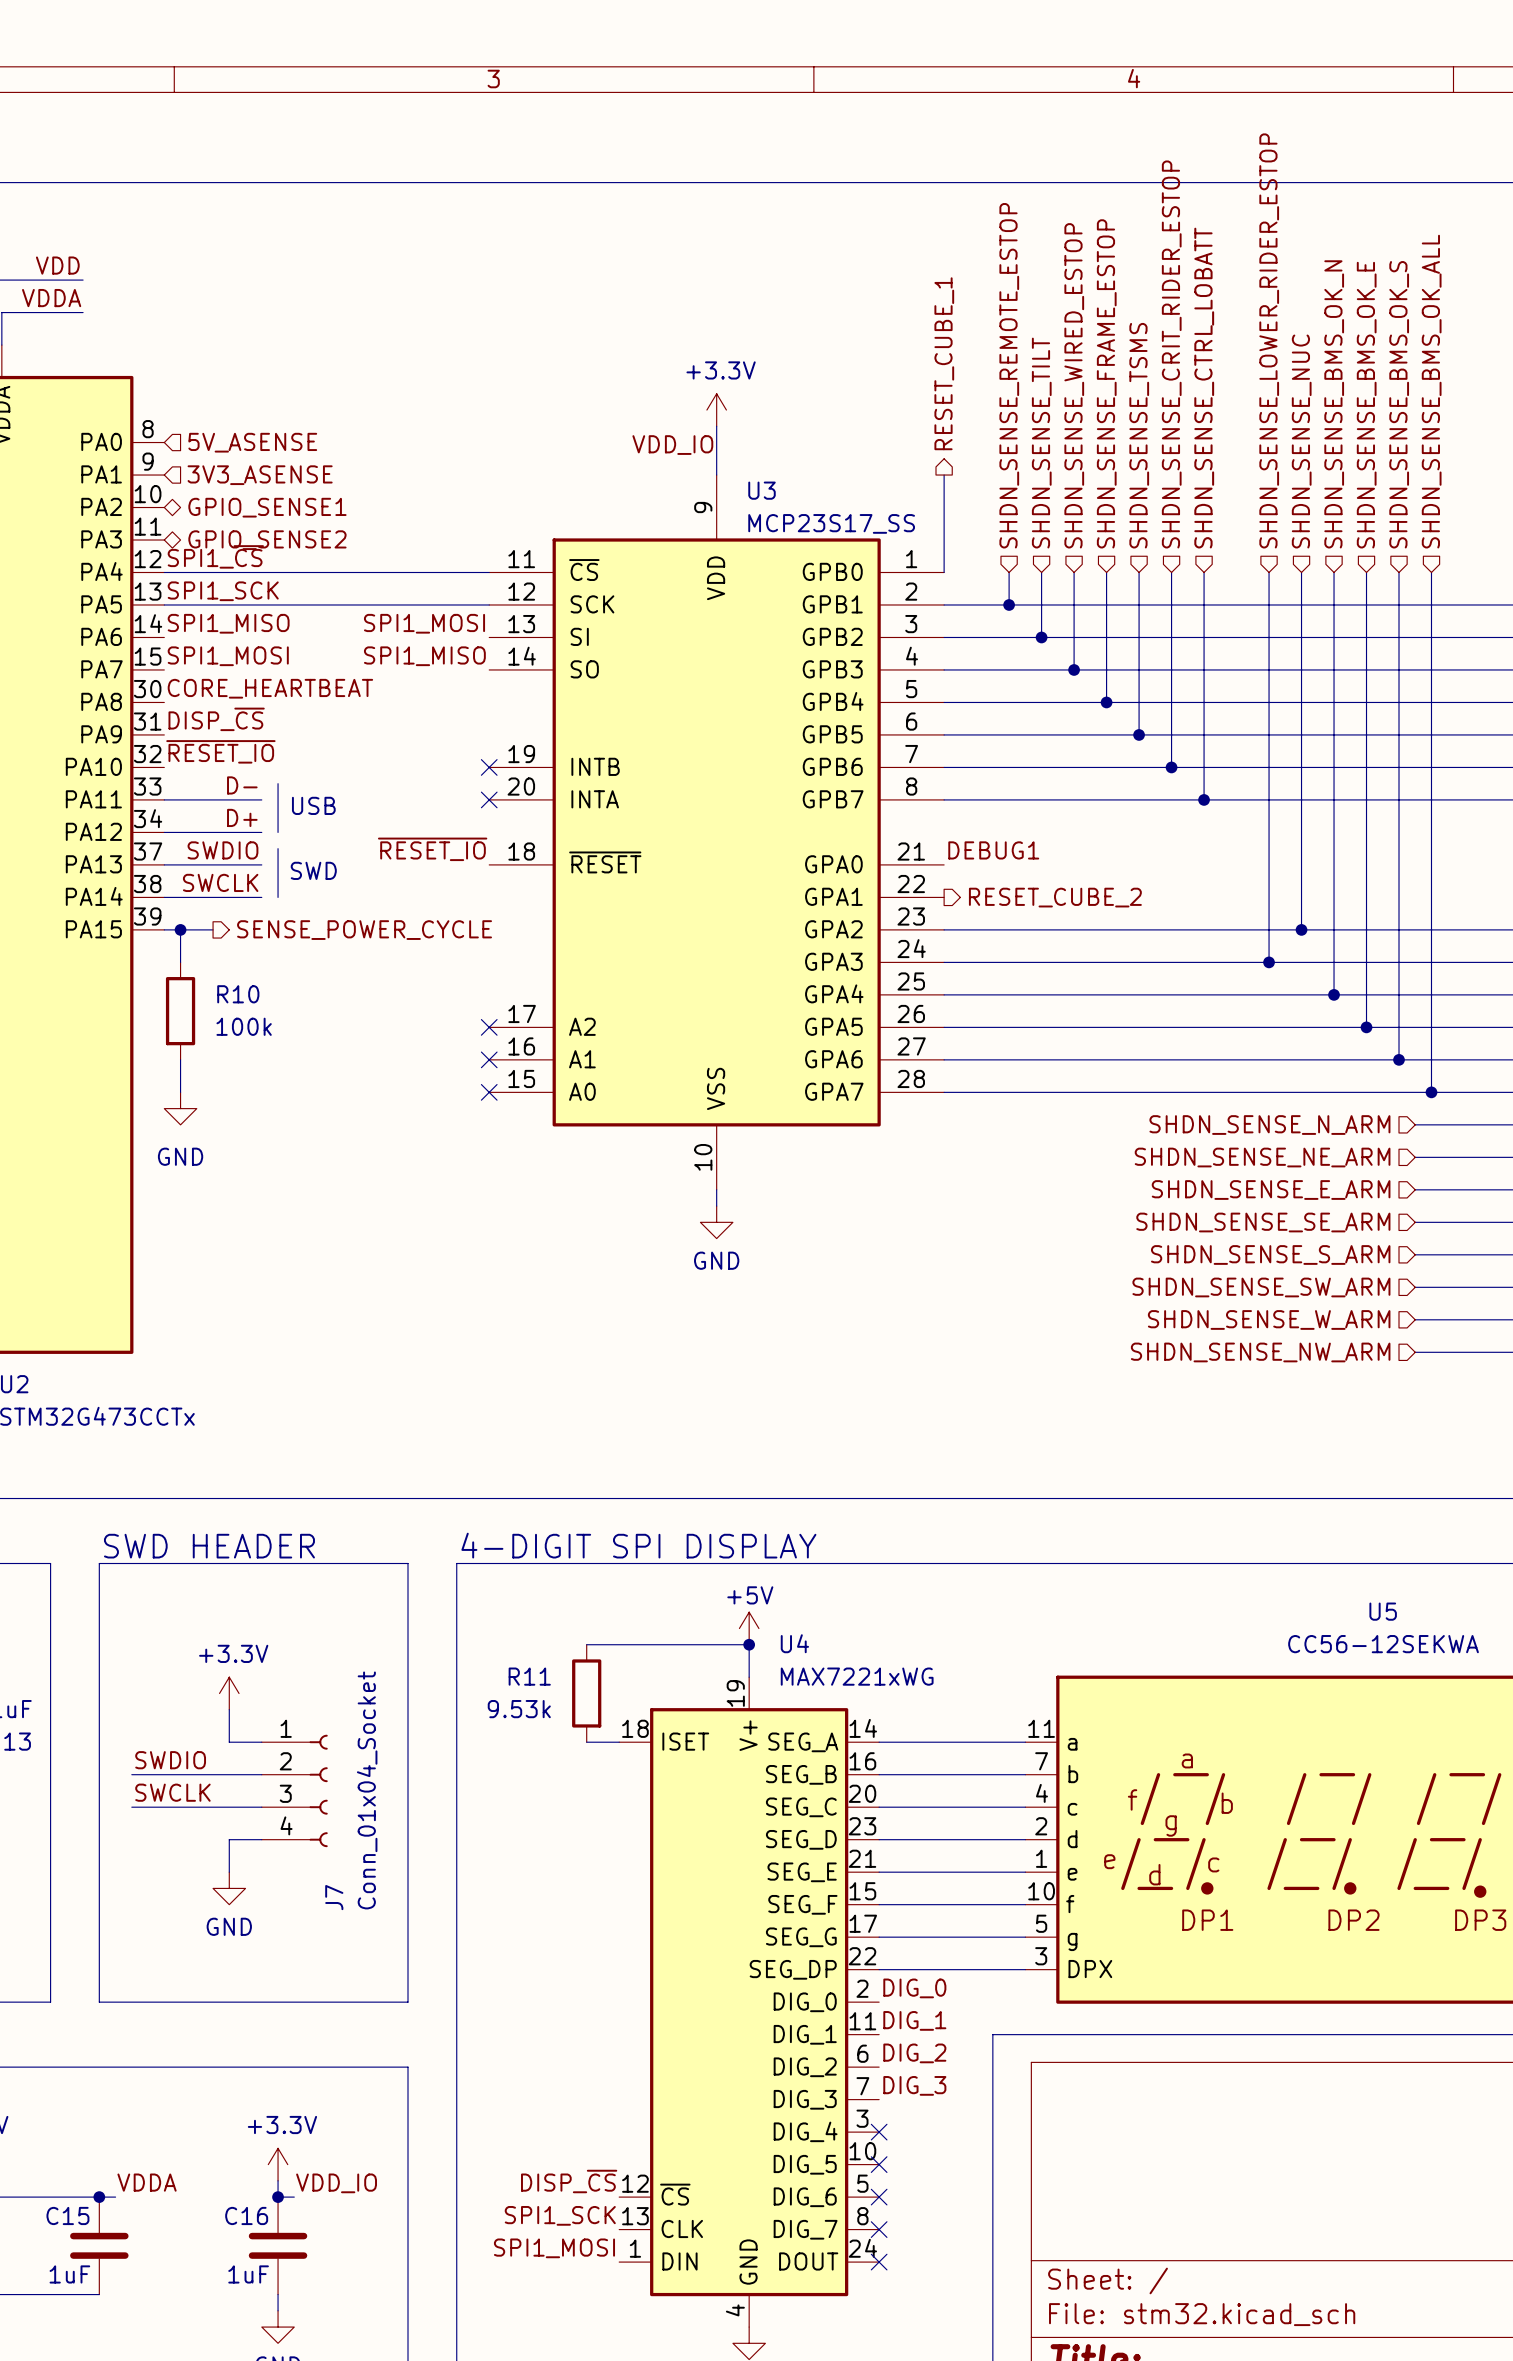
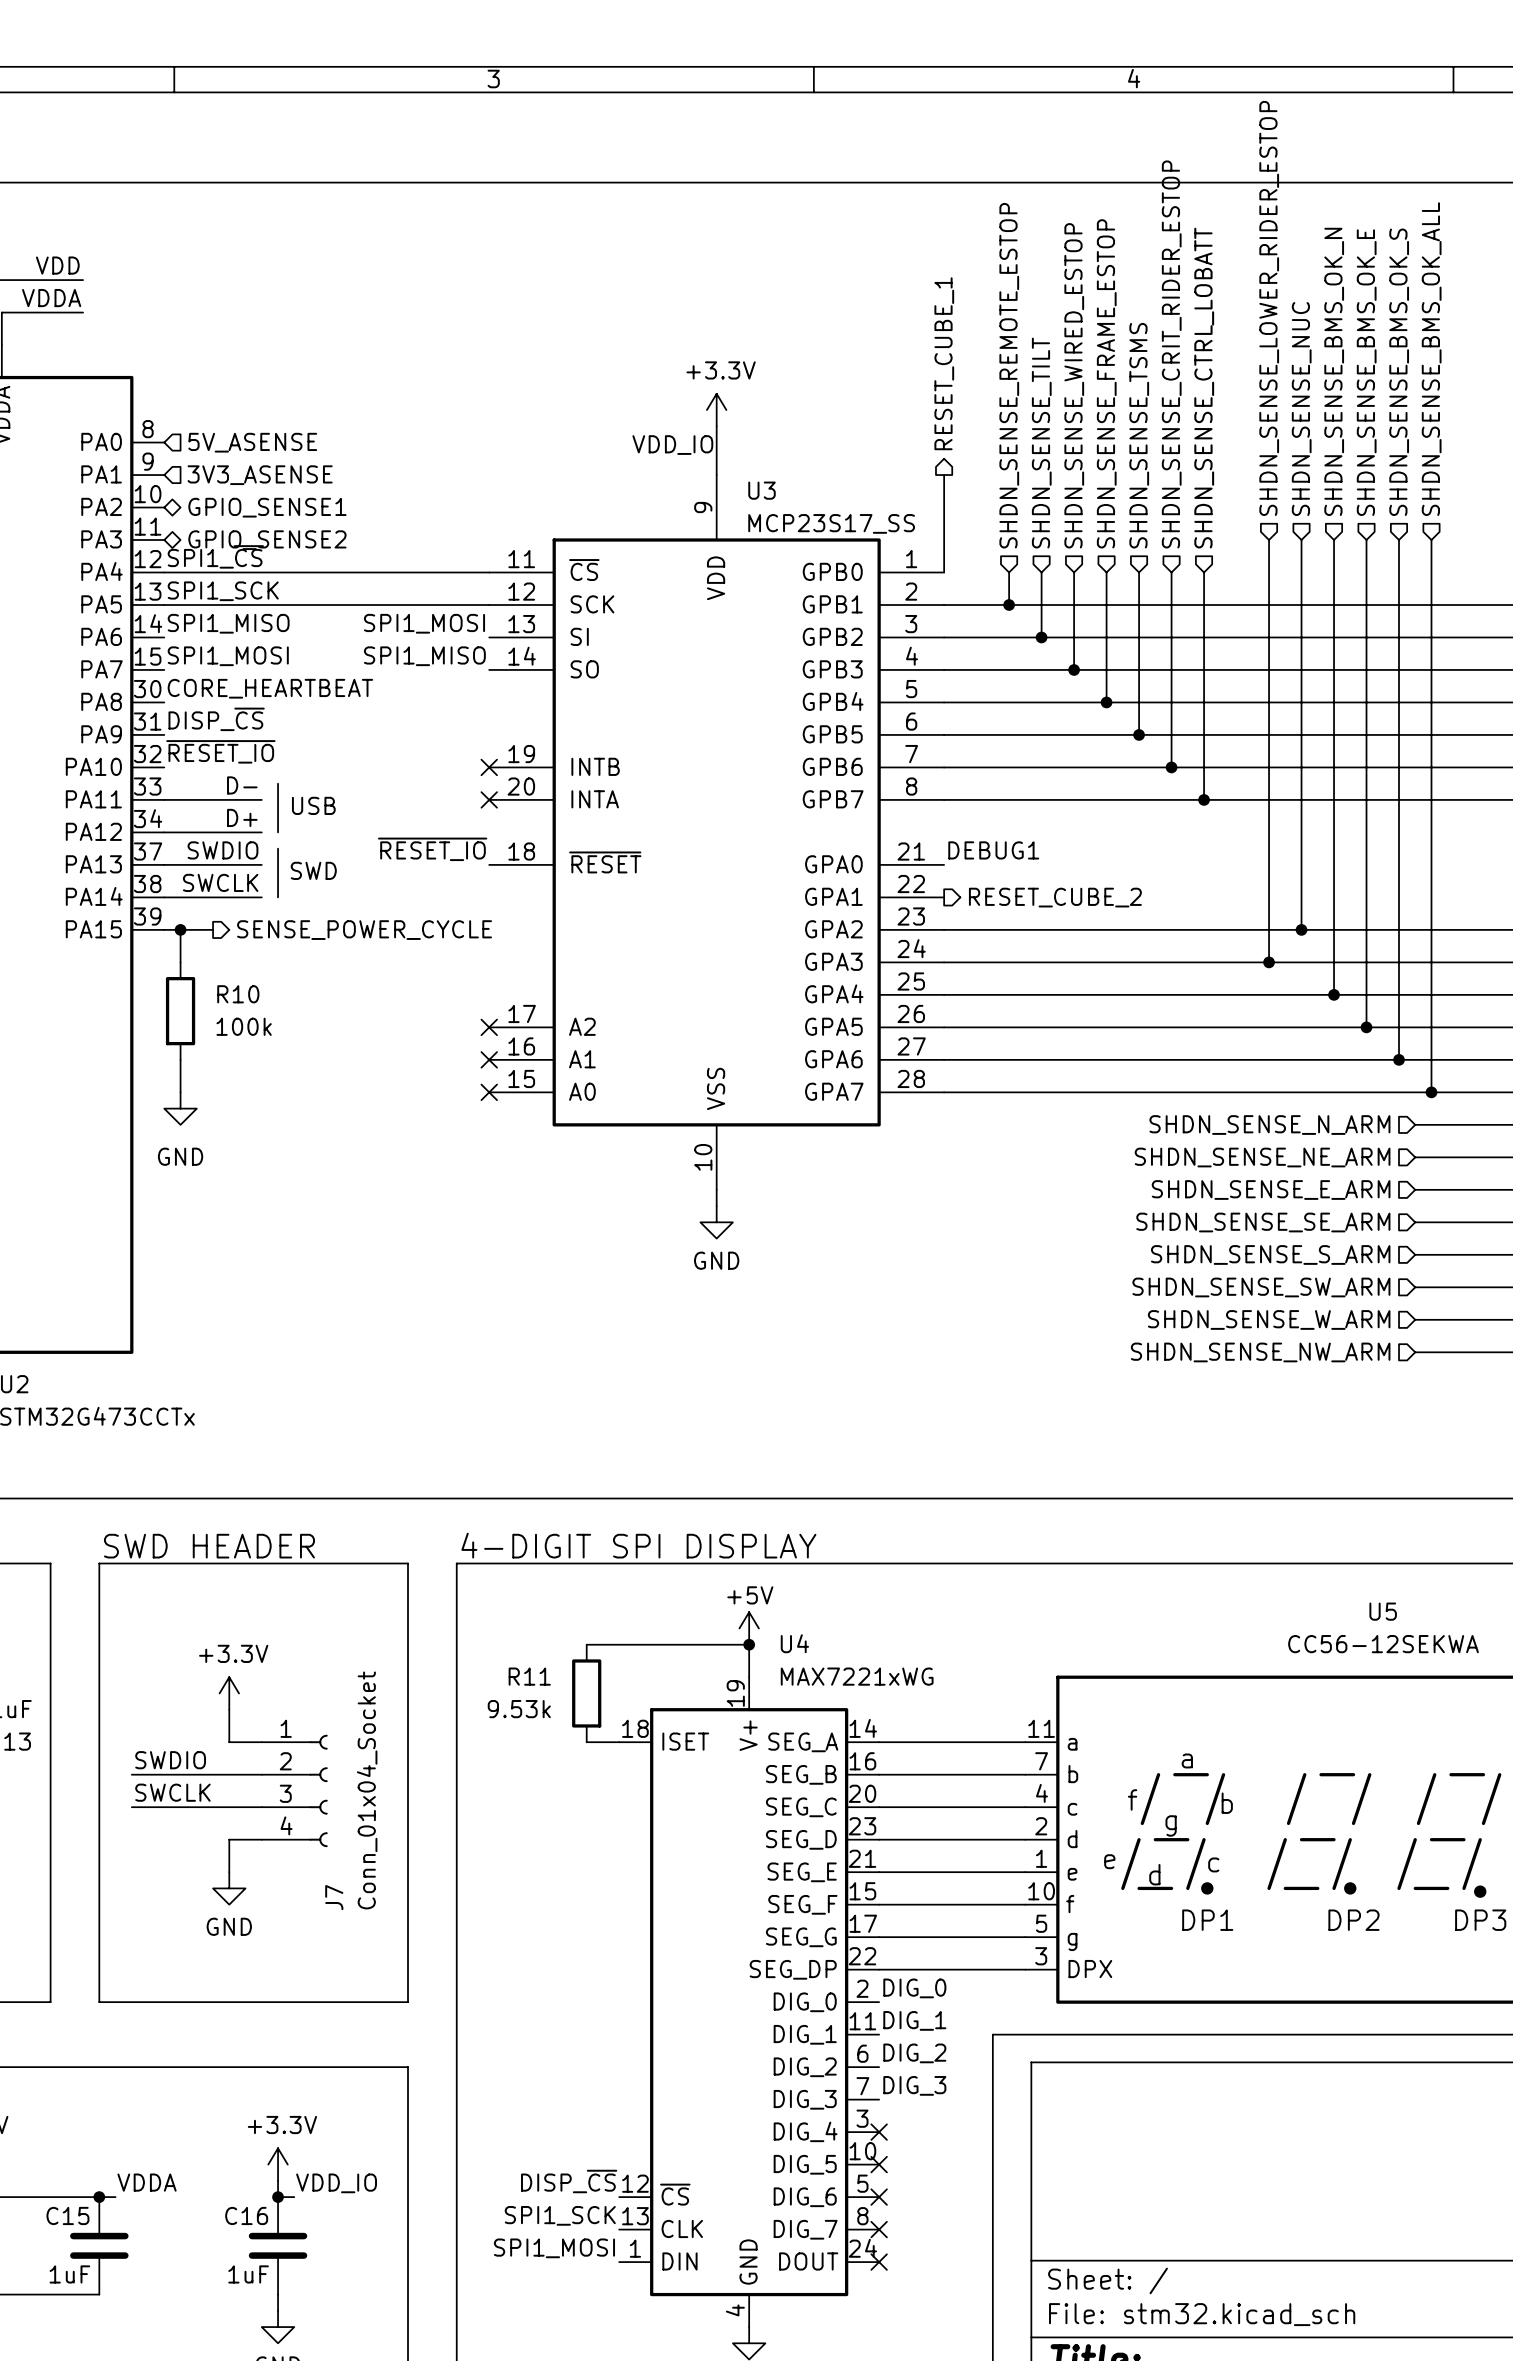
hierarchical label position: SHDN_SENSE_LOWER_RIDER_ESTOP (1269, 340) -> SHDN_SENSE_LOWER_RIDER_ESTOP (1269, 308)
hierarchical label position: SHDN_SENSE_BMS_OK_ALL (1431, 391) -> SHDN_SENSE_BMS_OK_ALL (1431, 359)
hierarchical label position: SHDN_SENSE_BMS_OK_N (1334, 404) -> SHDN_SENSE_BMS_OK_N (1334, 371)
hierarchical label position: SHDN_SENSE_BMS_OK_S (1399, 404) -> SHDN_SENSE_BMS_OK_S (1399, 372)
hierarchical label position: SHDN_SENSE_BMS_OK_E (1366, 405) -> SHDN_SENSE_BMS_OK_E (1366, 372)
hierarchical label position: SHDN_SENSE_NUC (1301, 441) -> SHDN_SENSE_NUC (1301, 409)
wire: none -> (1269, 540) (1269, 572)
wire: none -> (1301, 540) (1301, 572)
wire: none -> (1334, 540) (1334, 572)
wire: none -> (1366, 540) (1366, 572)
wire: none -> (1399, 540) (1399, 572)
wire: none -> (1431, 540) (1431, 572)

